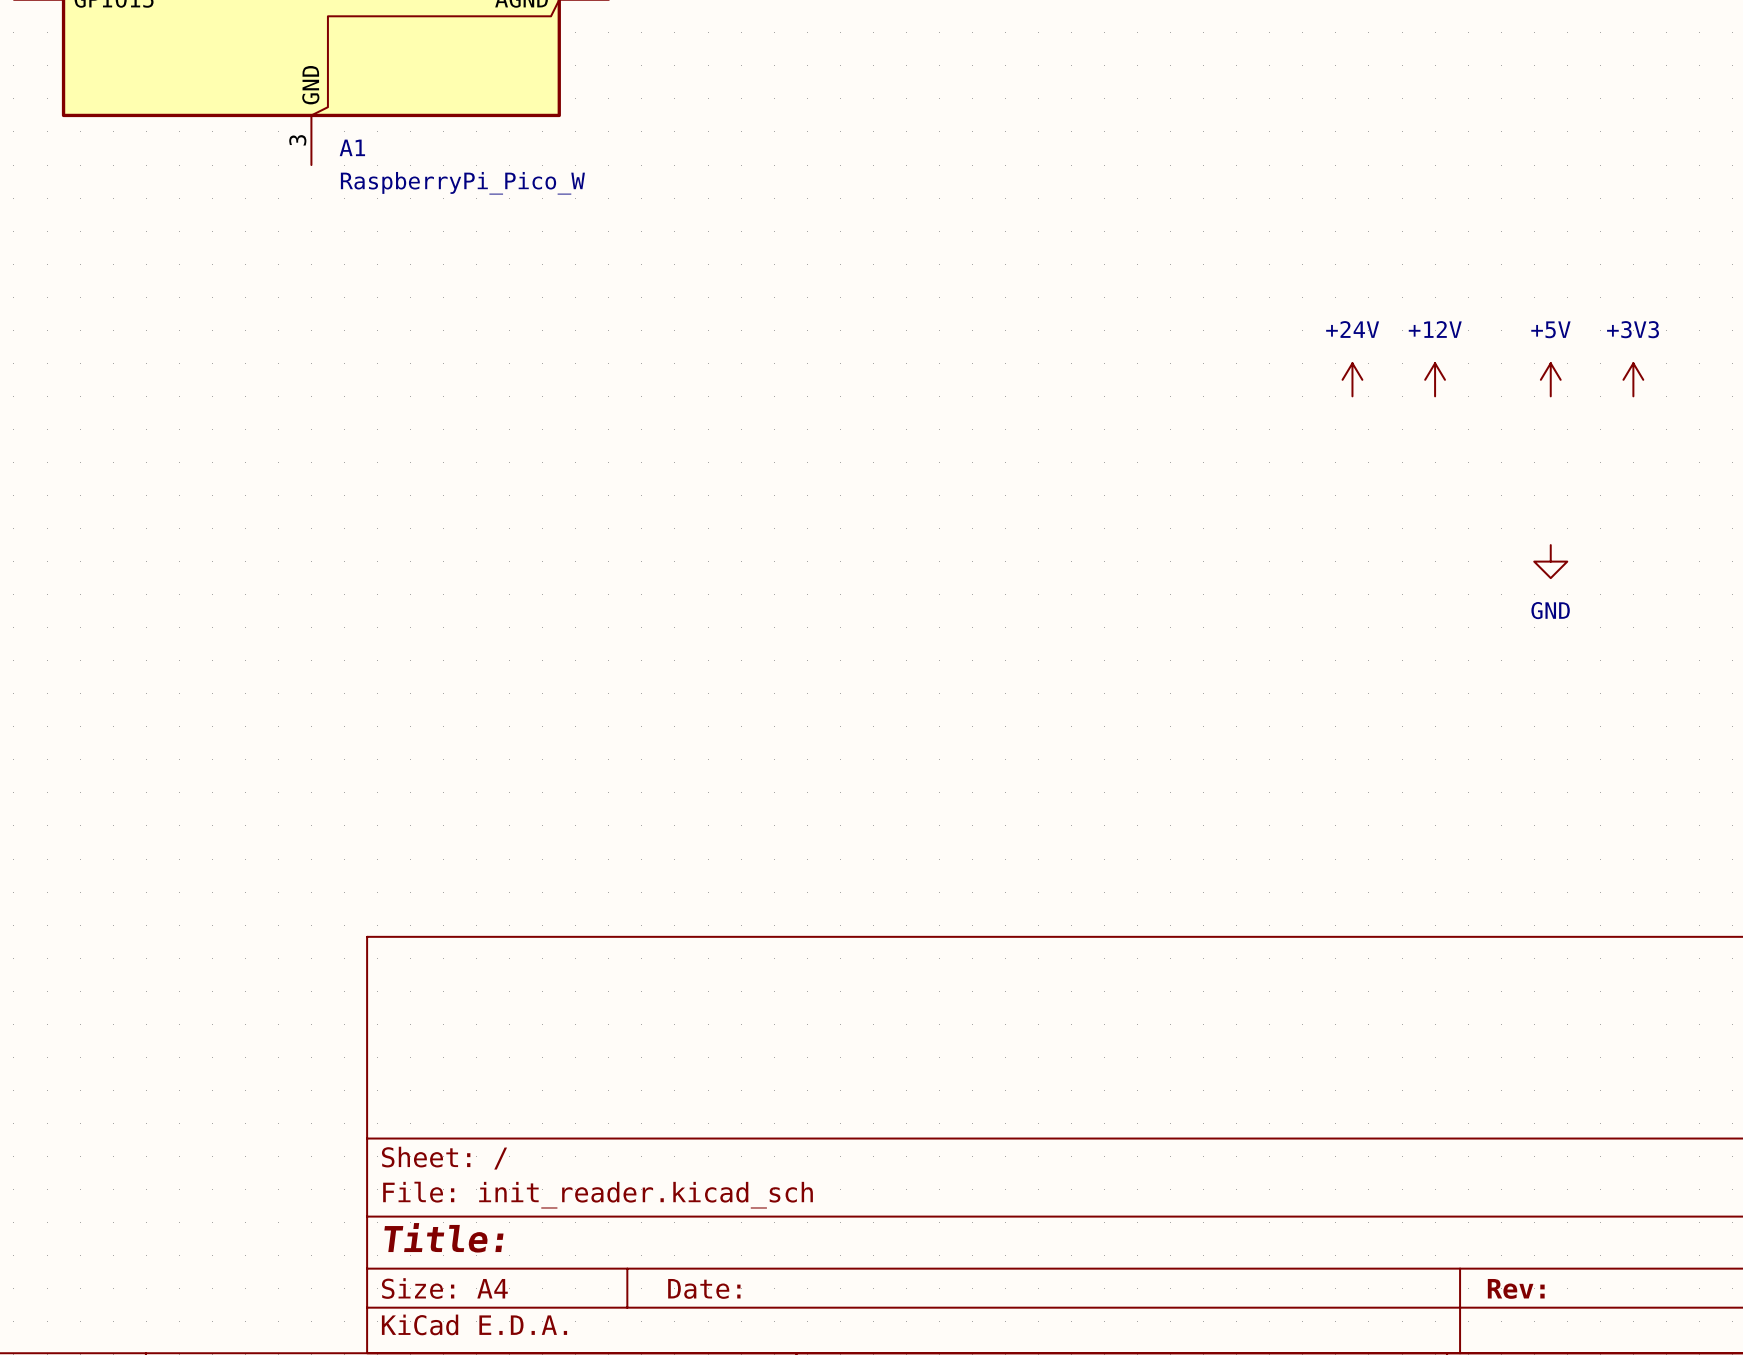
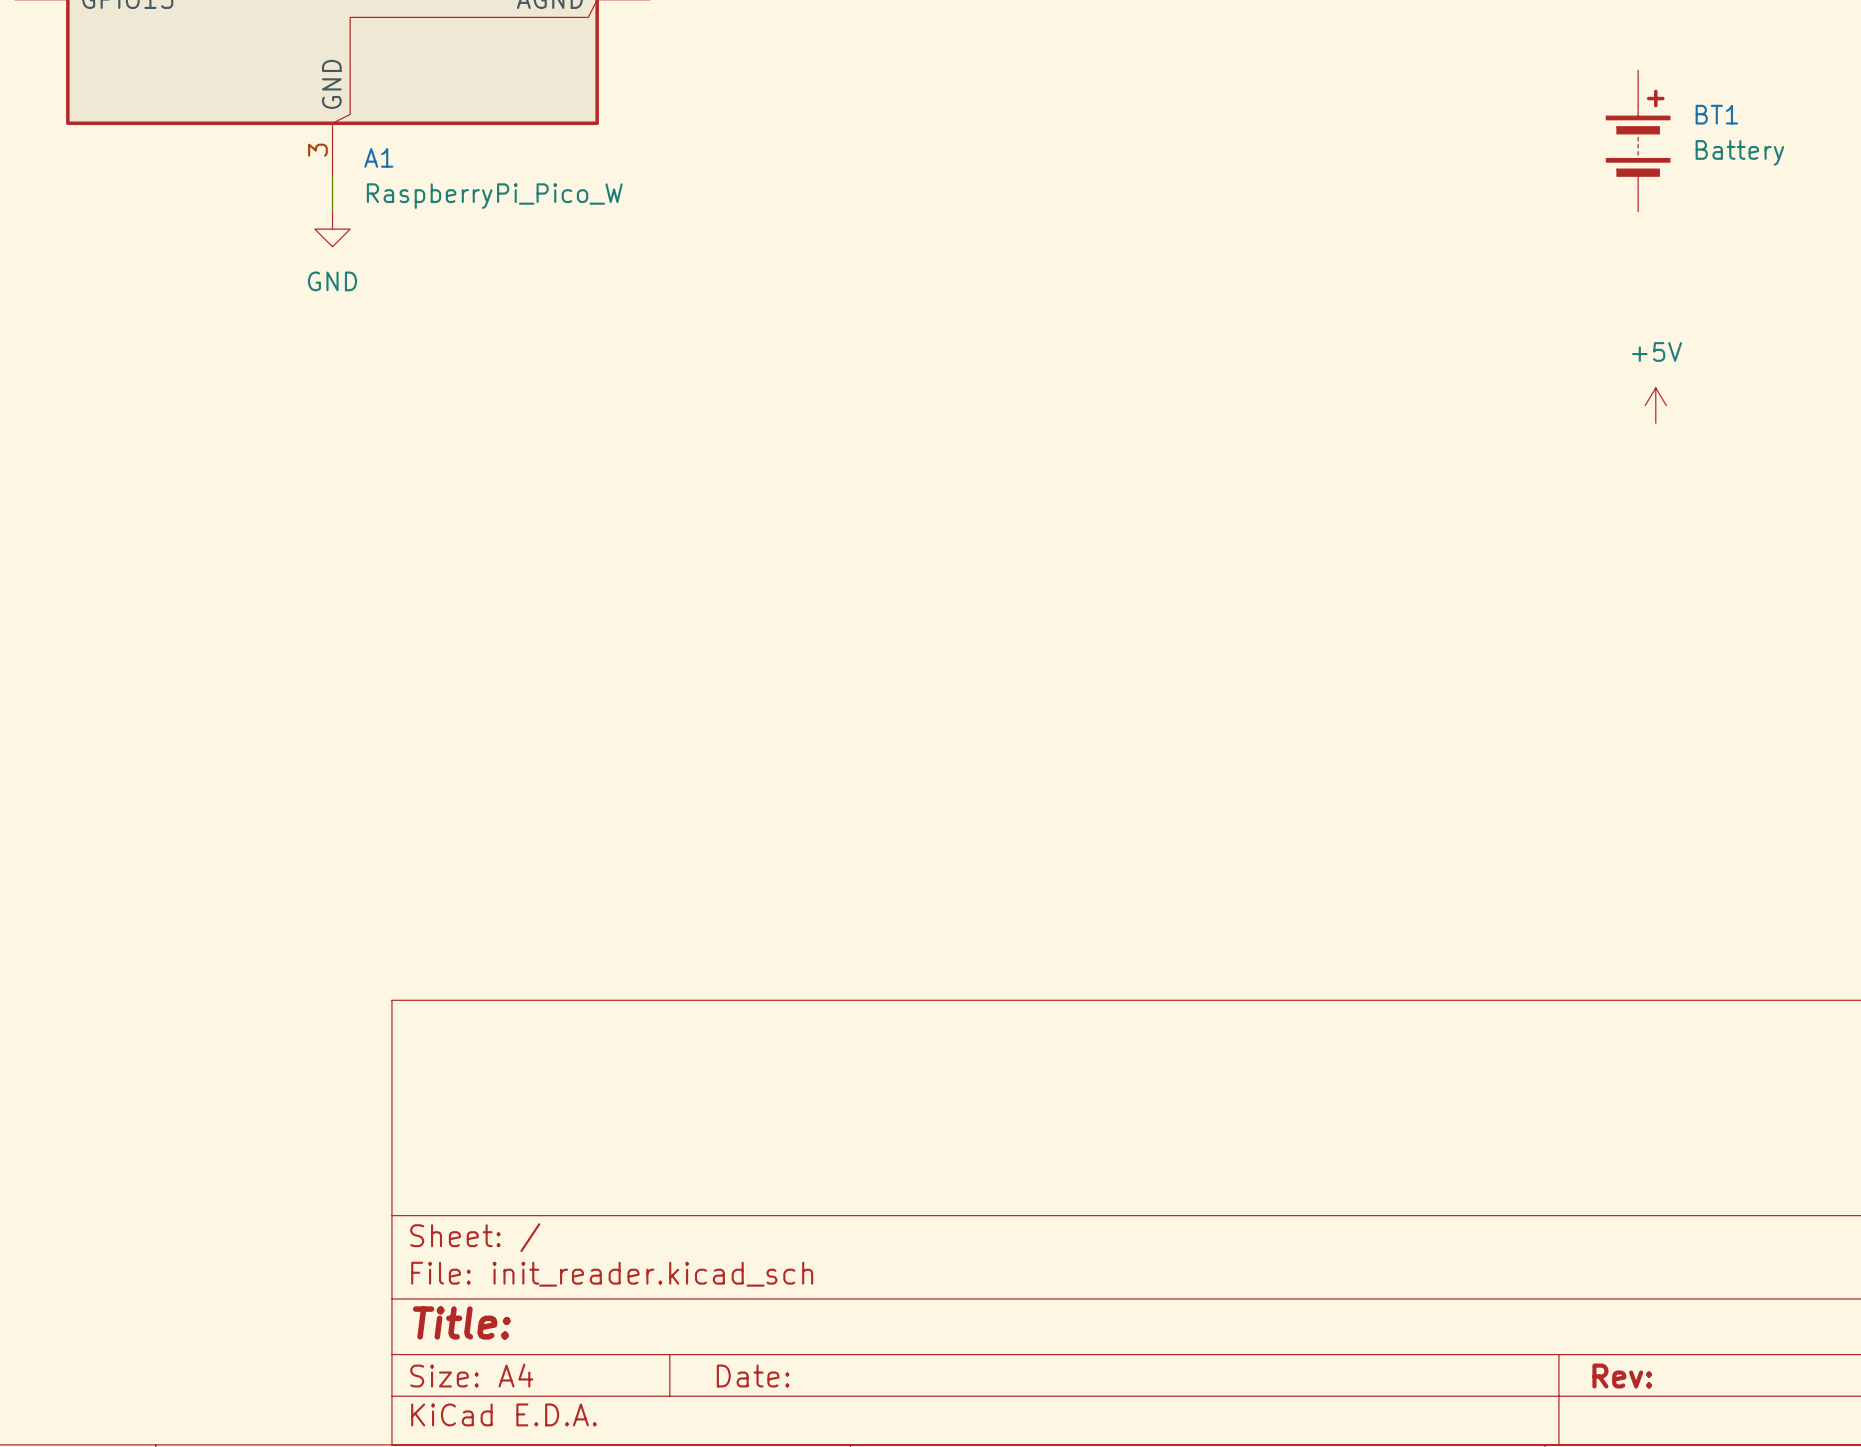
BT1: none -> Battery (1638, 140)
wire: none -> (332, 176) (332, 211)
power symbol: none -> GND (332, 229)
power symbol: +24V (1352, 379) -> none
power symbol: +12V (1435, 379) -> none
power symbol: +3V3 (1633, 379) -> none
power symbol: GND (1550, 561) -> none

